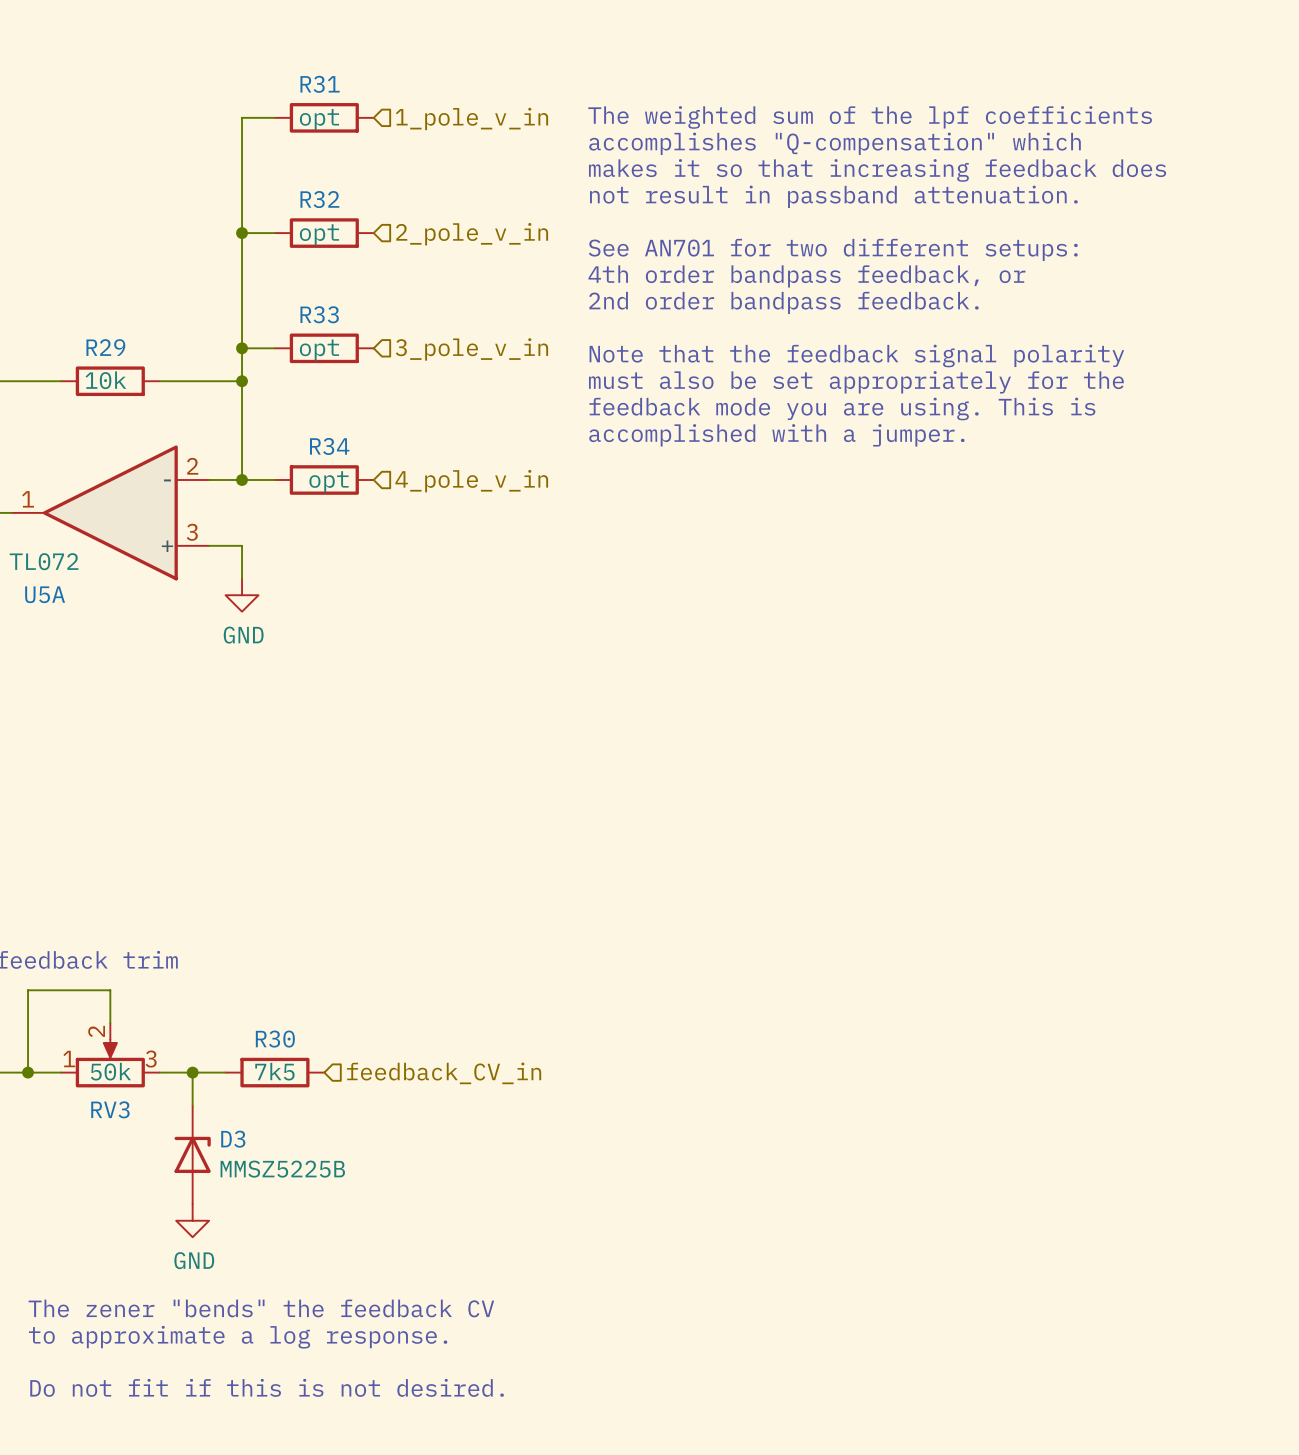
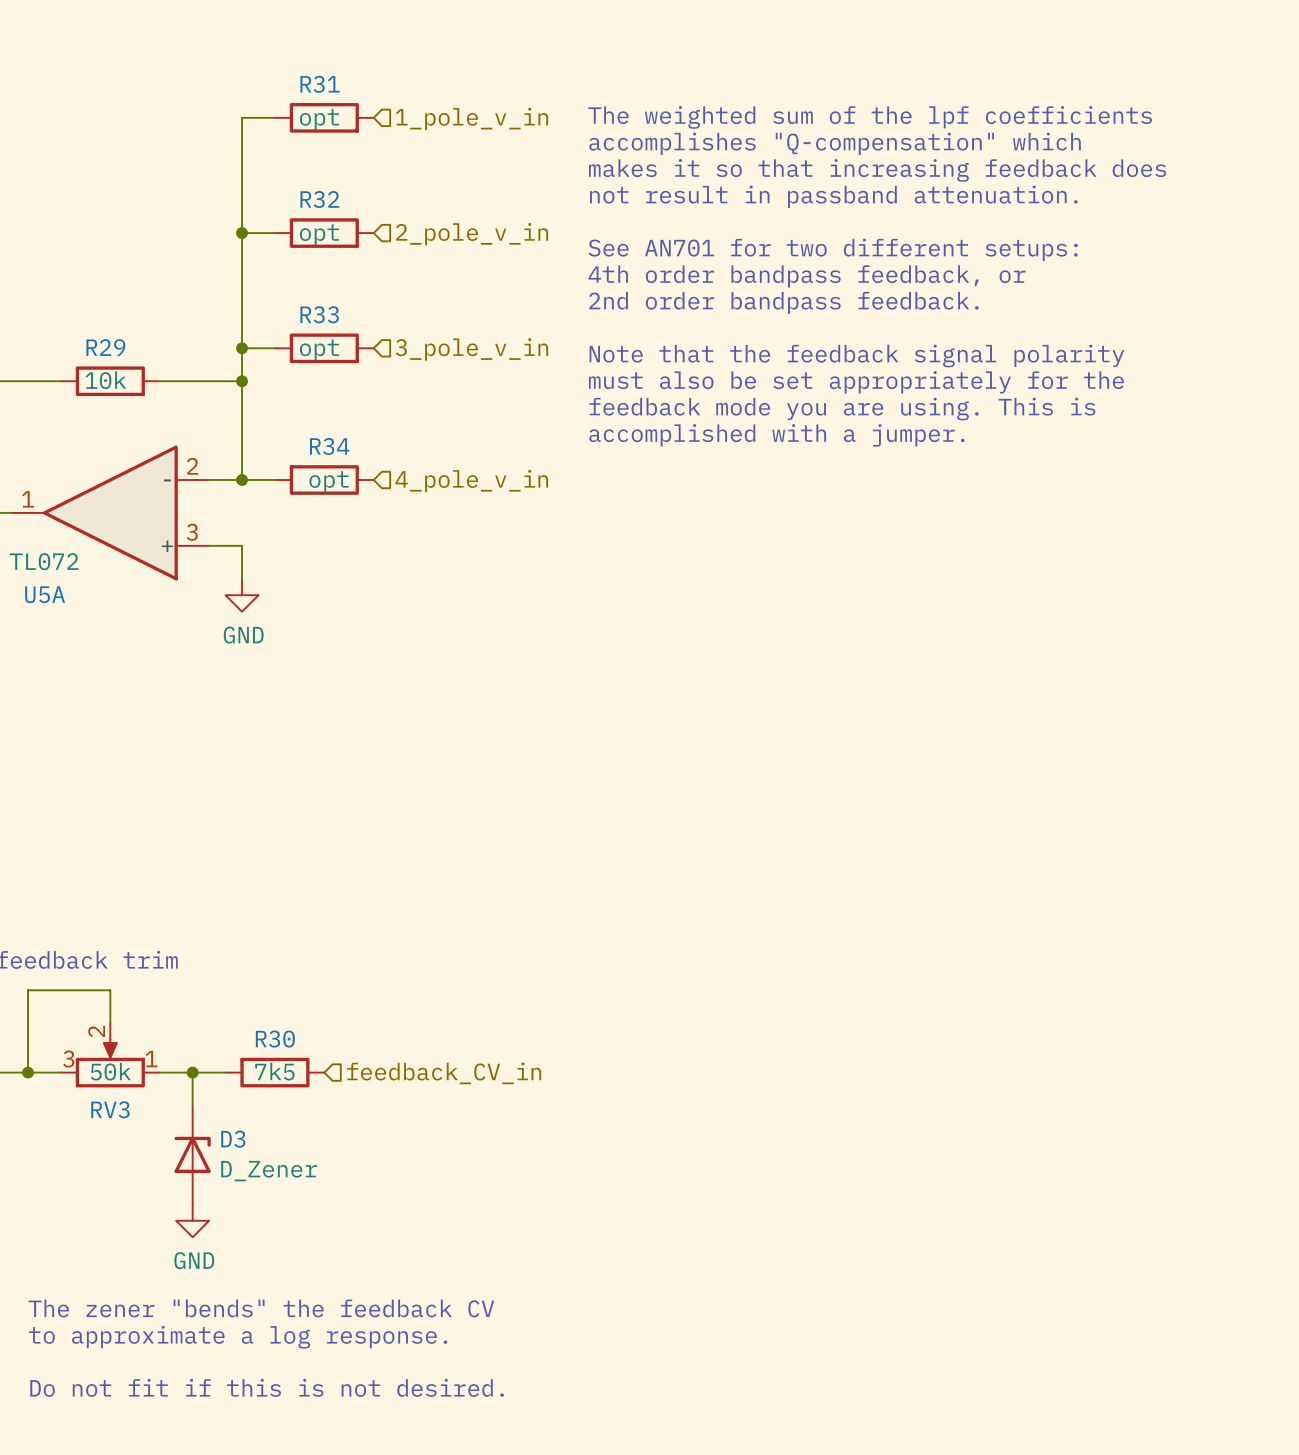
RV3 flip: as is (110, 1063) -> left-right (110, 1063)
D3 value: MMSZ5225B (282, 1169) -> D_Zener (269, 1171)

